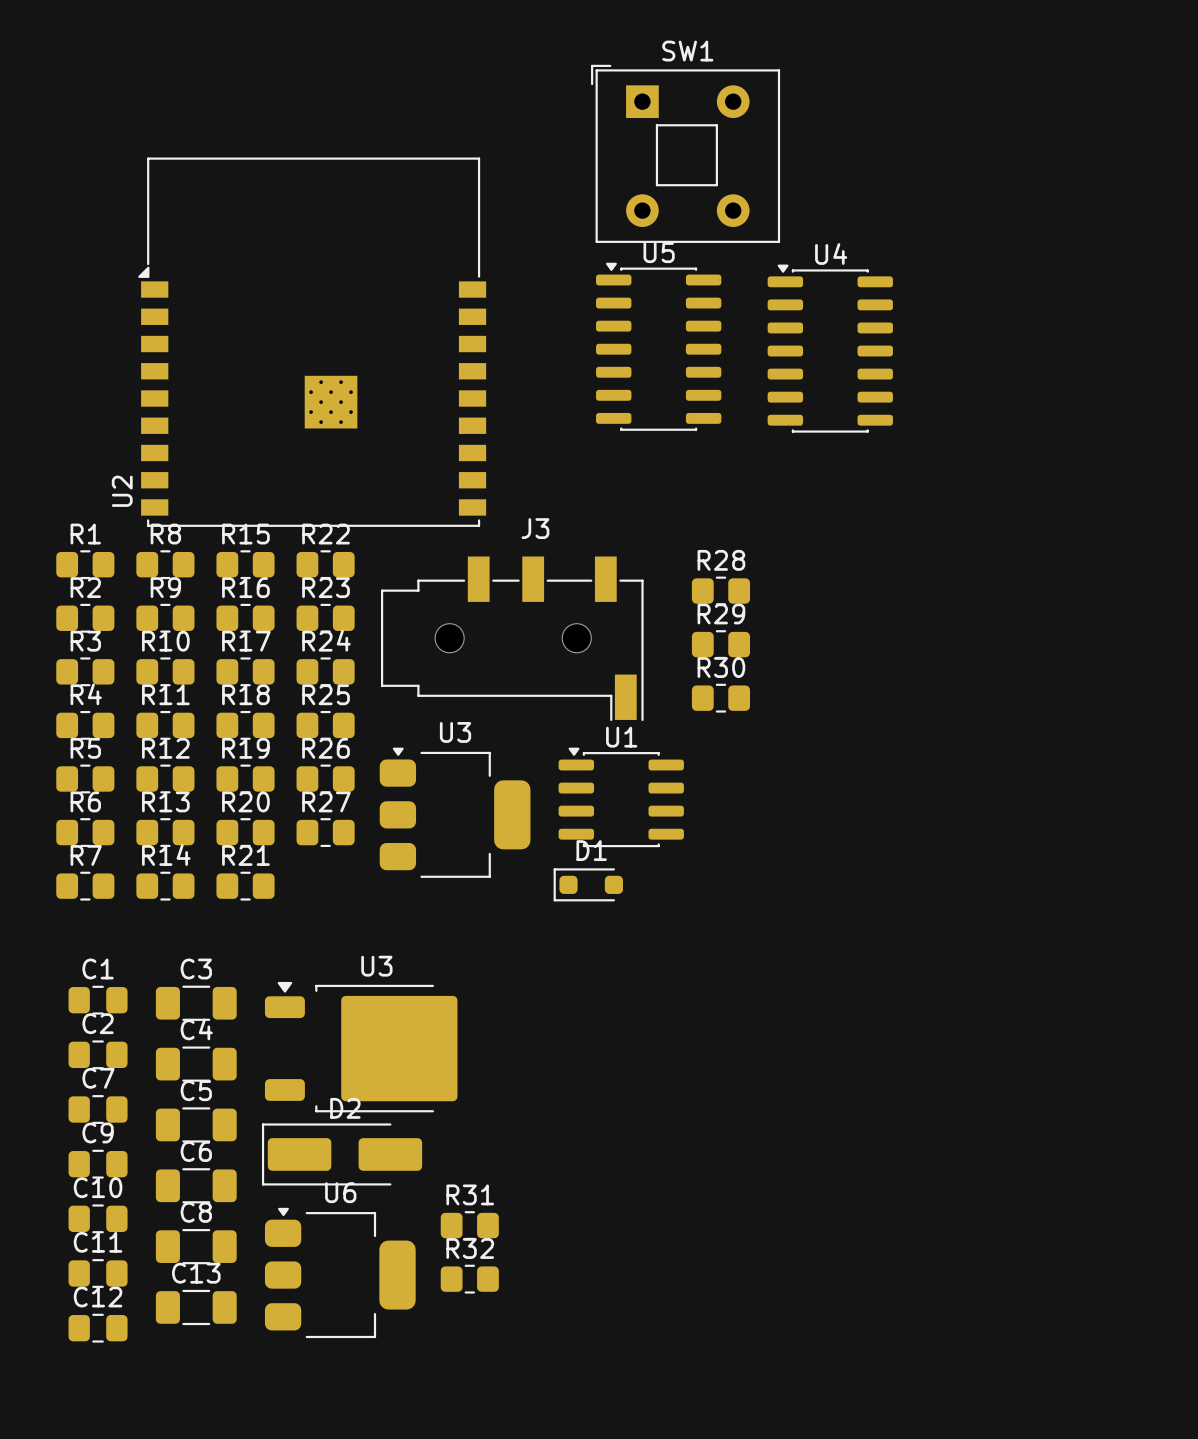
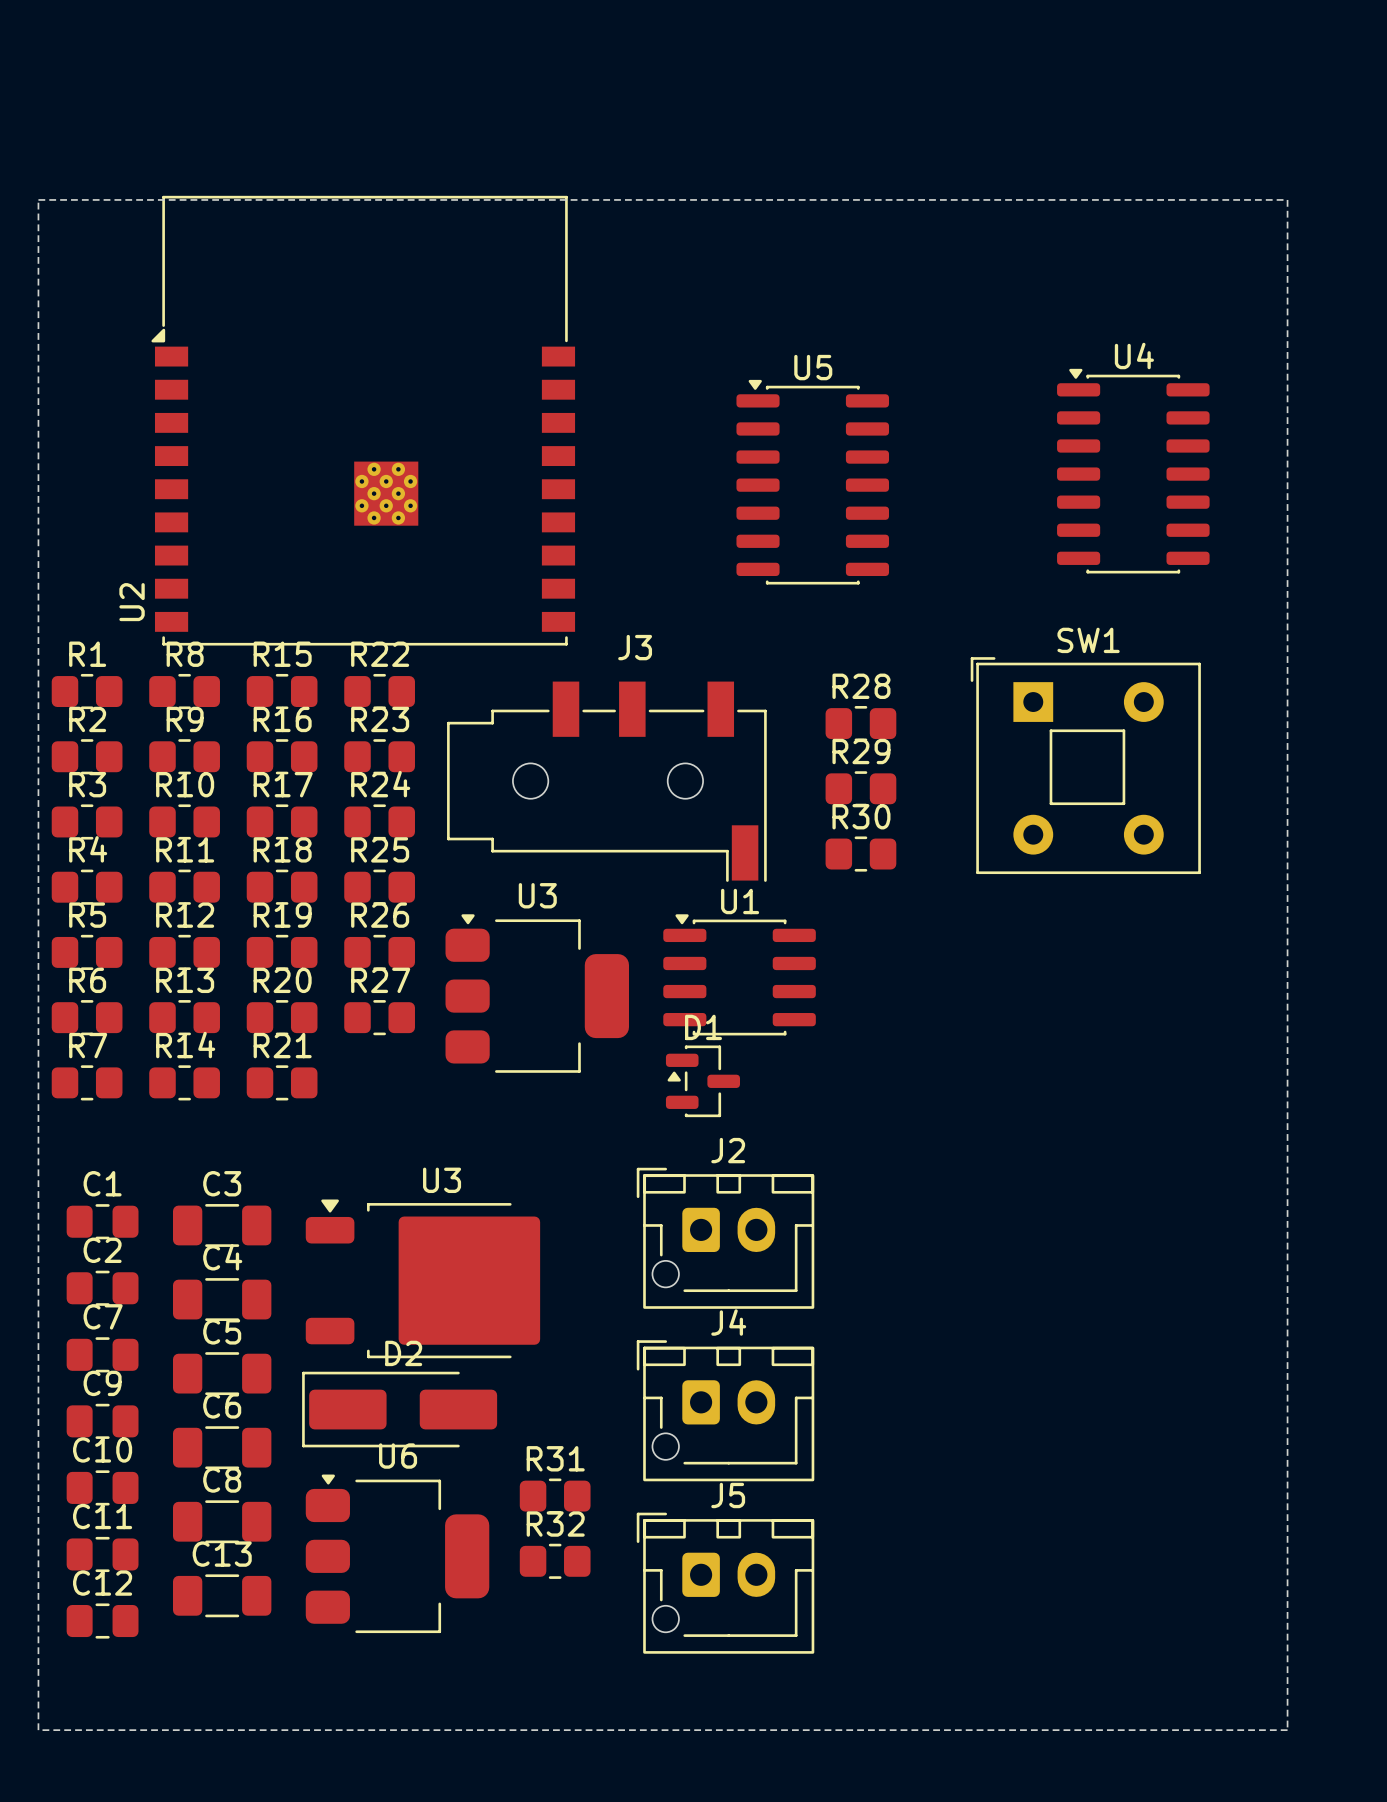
SW1 position: (685, 153) -> (1085, 765)
board edge: none -> (38, 199) (1287, 199) (1287, 1730) (38, 1730) (38, 199)
U5 position: (658, 346) -> (812, 482)
U4 position: (830, 348) -> (1133, 471)
D1 footprint: [553, 868, 623, 902] -> [665, 1045, 741, 1118]
J2: none -> (725, 1238)
J4: none -> (725, 1410)
J5: none -> (725, 1583)

